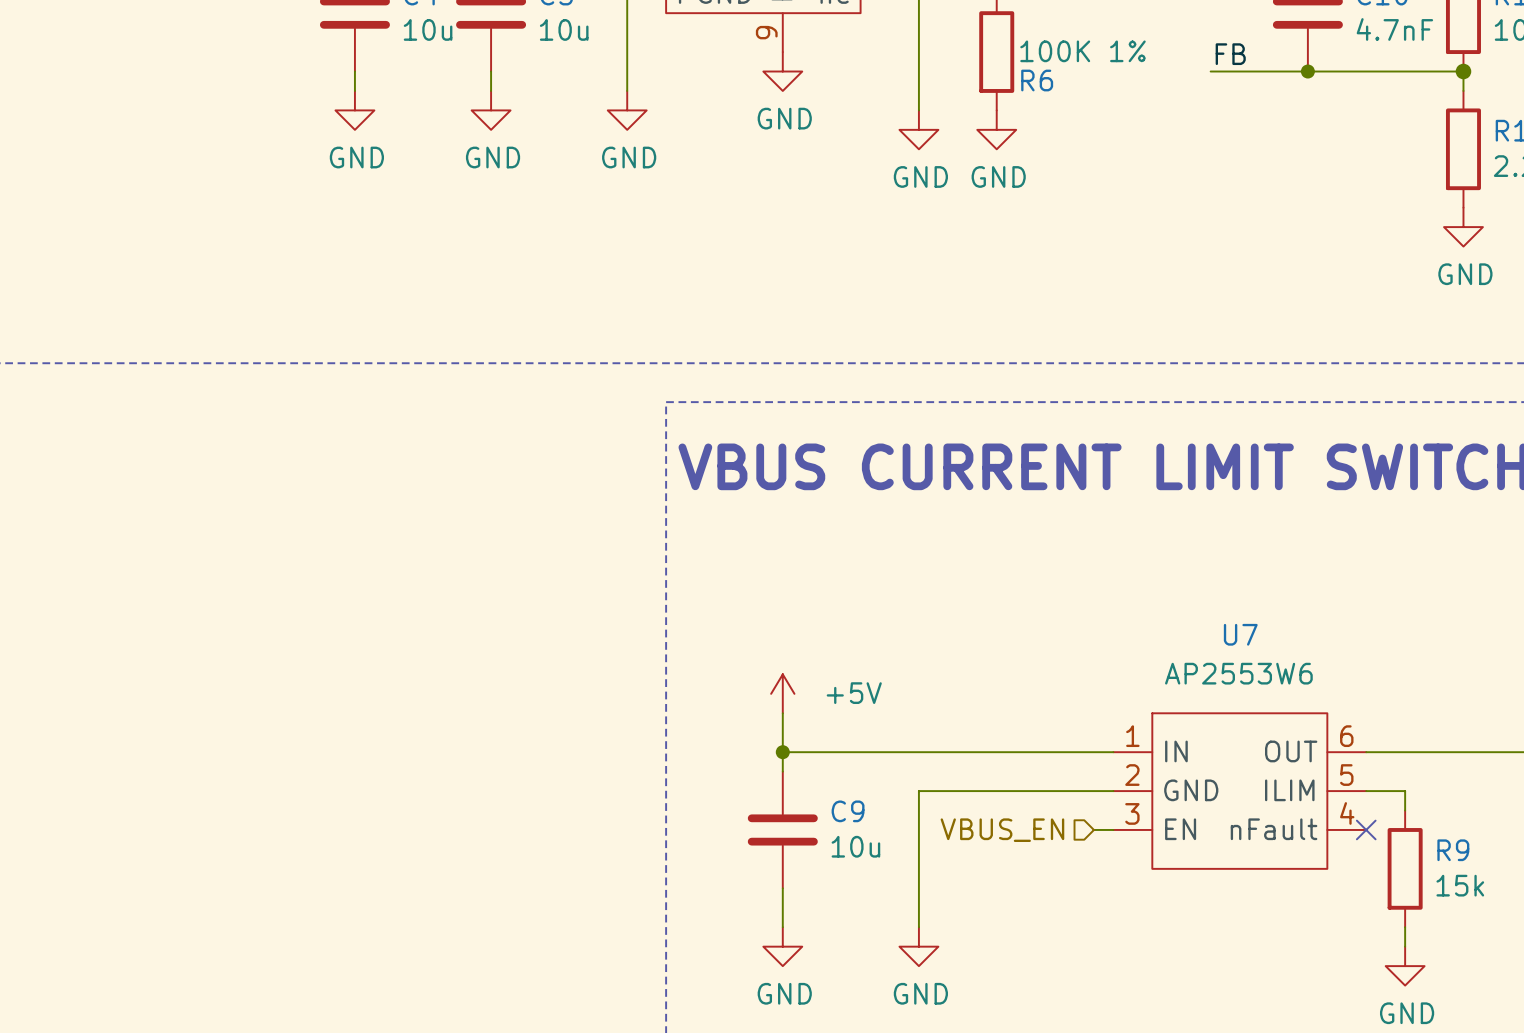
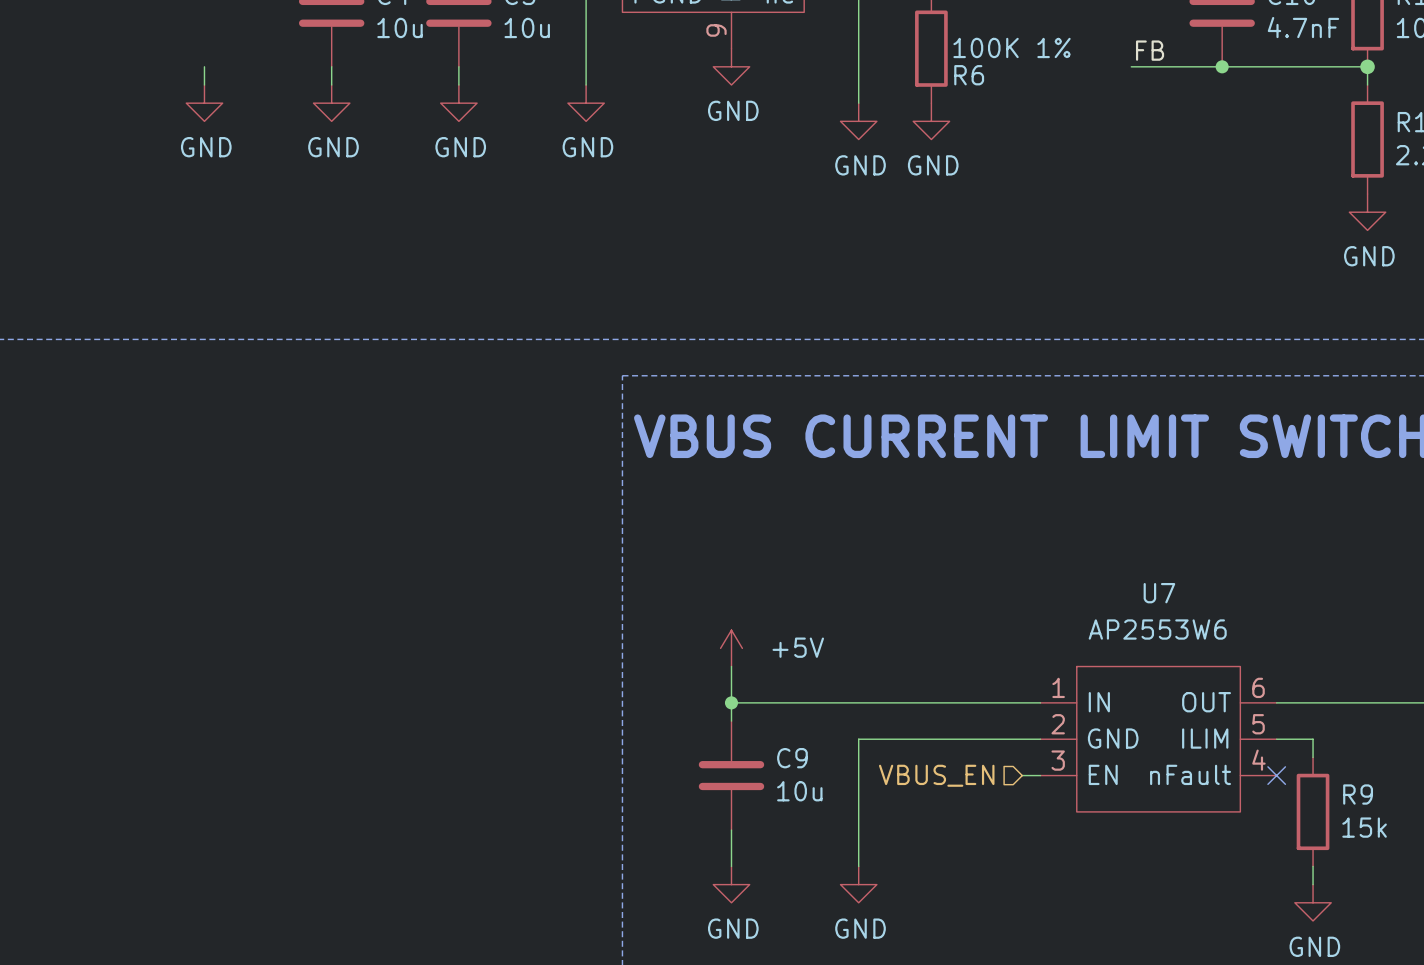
wire: none -> (204, 66) (204, 84)
power symbol: none -> GND (204, 103)

